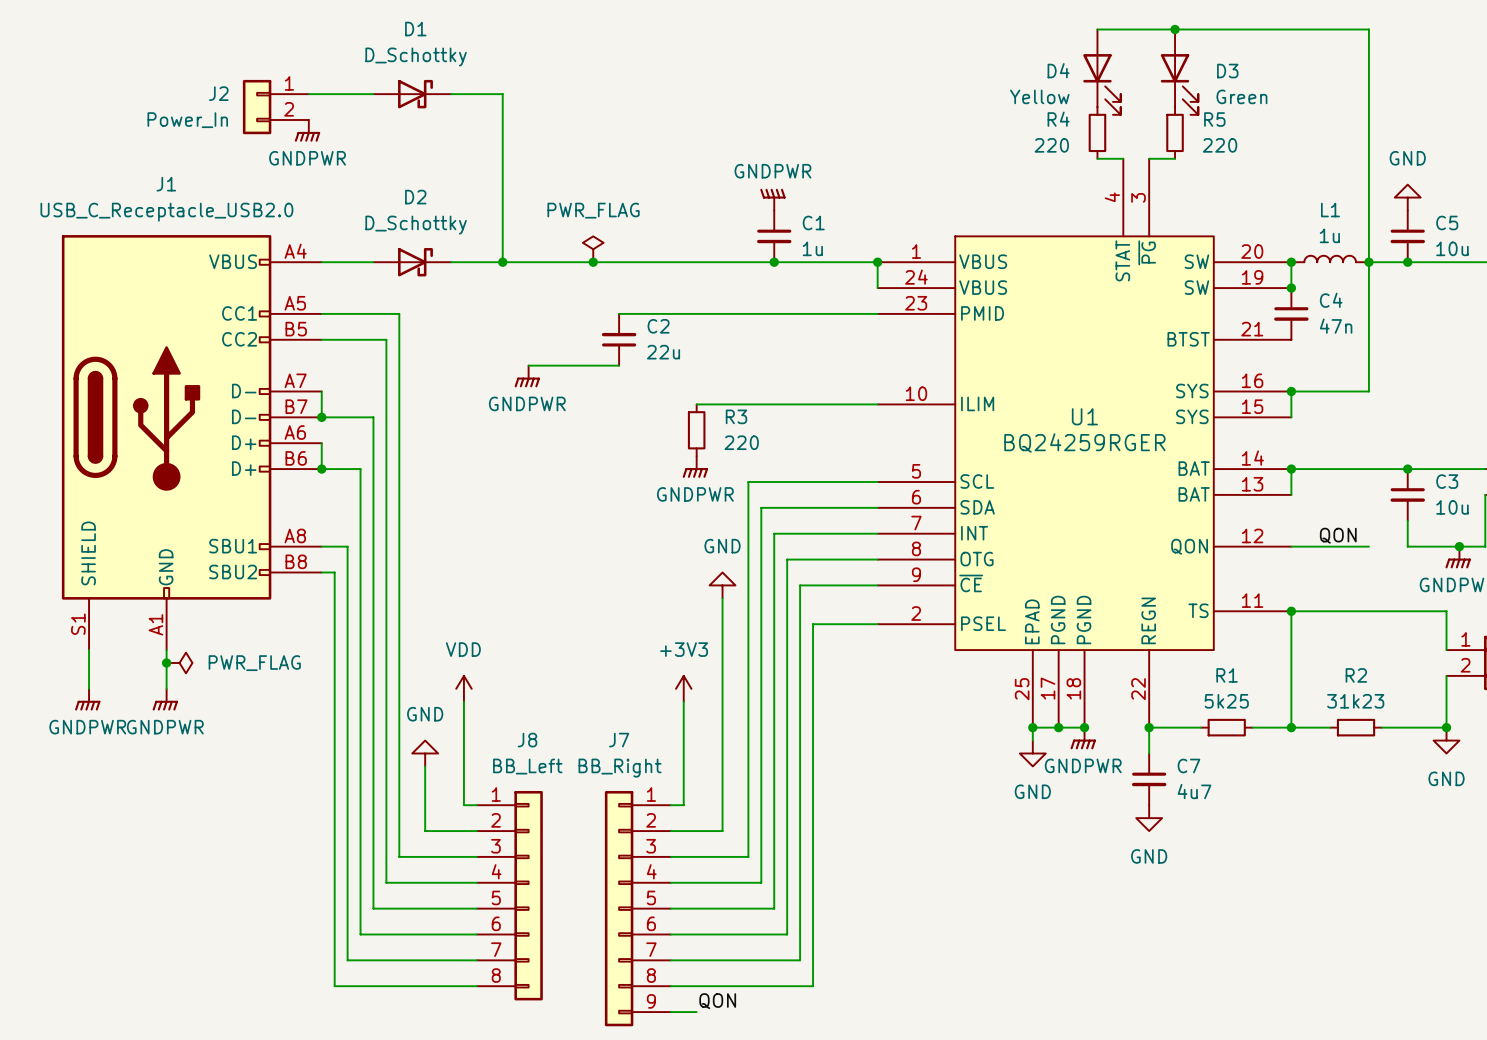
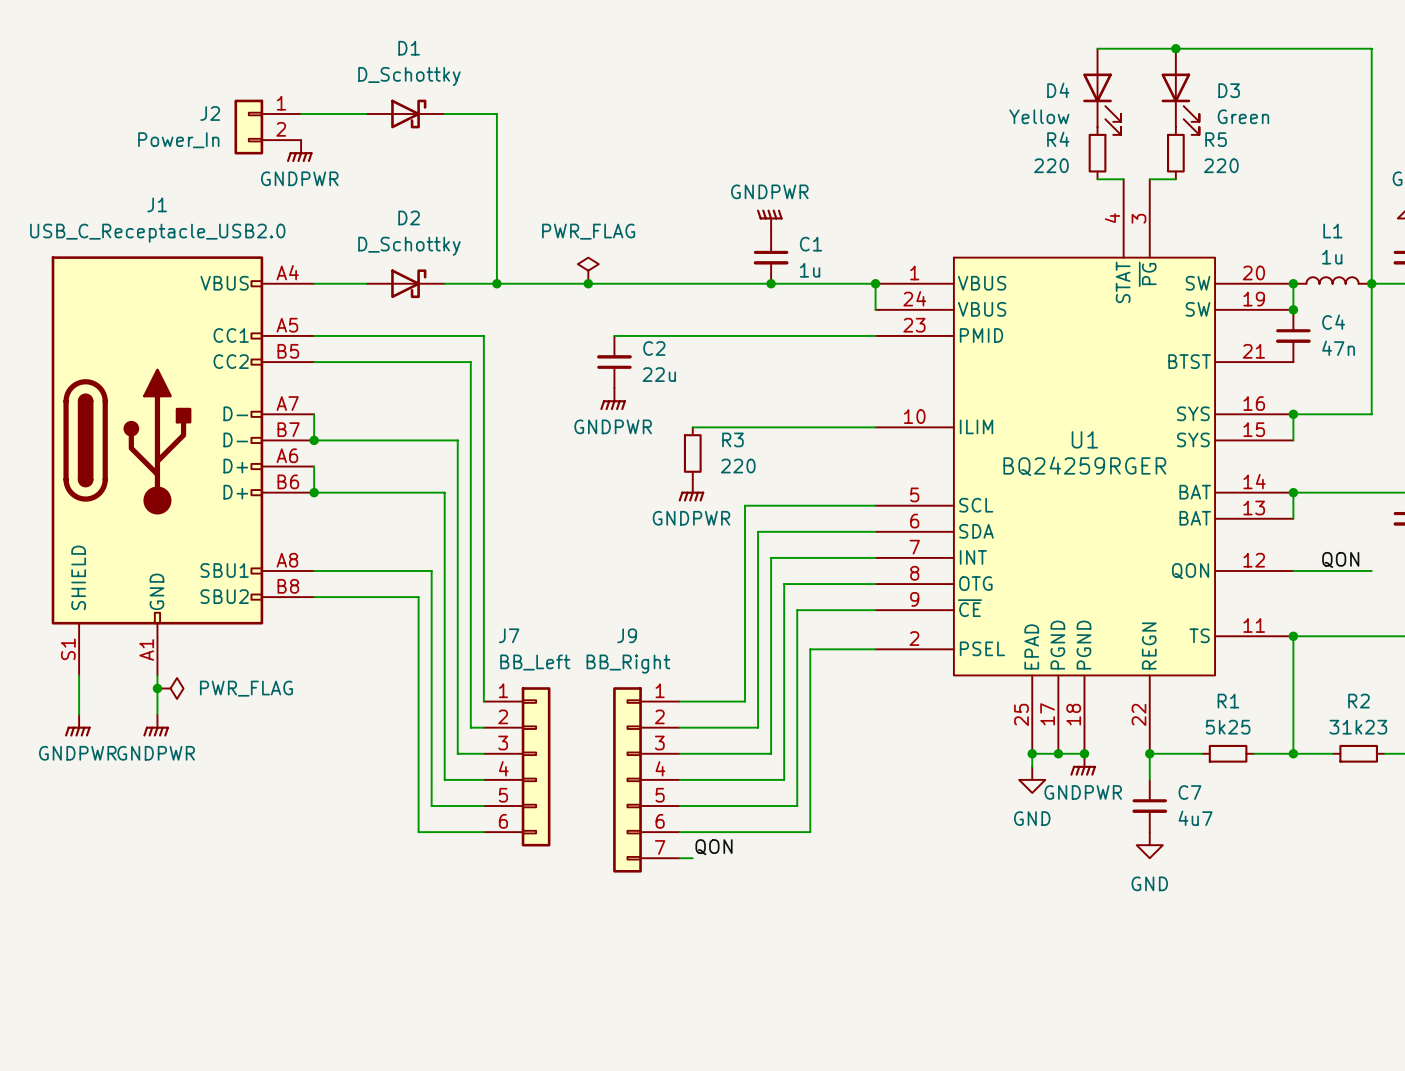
wire: (399, 313) (399, 856) (476, 856) -> (392, 335) (483, 335) (483, 701)
wire: (386, 339) (386, 882) (476, 882) -> (379, 362) (470, 362) (470, 727) (483, 727)
wire: (528, 365) (619, 365) -> none
power symbol position: GNDPWR (527, 376) -> GNDPWR (613, 399)
wire: (373, 417) (373, 908) (476, 908) -> (366, 440) (457, 440) (457, 727)
wire: (360, 469) (360, 934) (476, 934) -> (353, 492) (444, 492) (444, 779) (483, 779)
wire: (347, 546) (347, 960) (476, 960) -> (340, 570) (431, 570) (431, 806) (483, 806)
wire: (334, 572) (334, 986) (476, 986) -> (327, 597) (418, 597) (418, 792)
power symbol: GND (722, 585) -> none
wire: (722, 598) (722, 831) (696, 831) -> none
wire: (748, 675) (748, 856) (670, 856) -> (745, 701) (679, 701)
power symbol: VDD (463, 688) -> none
power symbol: +3V3 (683, 688) -> none
wire: (683, 701) (683, 805) (670, 805) -> (679, 727) (758, 727)
wire: (761, 701) (761, 882) (670, 882) -> none
wire: (463, 727) (463, 805) -> (457, 753) (483, 753)
wire: (774, 727) (774, 908) (670, 908) -> (771, 753) (679, 753)
J7 name position: J7 (619, 740) -> J7 (509, 635)
power symbol: GND (425, 753) -> none
J9: none -> BB_Right (646, 779)
wire: (787, 753) (787, 934) (670, 934) -> (784, 779) (679, 779)
J7 value: BB_Right (620, 768) -> BB_Left (535, 662)
wire: (800, 779) (800, 960) (670, 960) -> (797, 806) (679, 806)
J7 symbol: [604, 790, 671, 1027] -> [483, 687, 551, 847]
wire: (425, 805) (425, 831) (476, 831) -> (418, 832) (457, 832)
wire: (813, 805) (813, 986) (670, 986) -> (810, 832) (679, 832)
J8: BB_Left (509, 895) -> none
label position: QON (717, 1001) -> QON (714, 847)
wire: (670, 1012) (696, 1012) -> none

